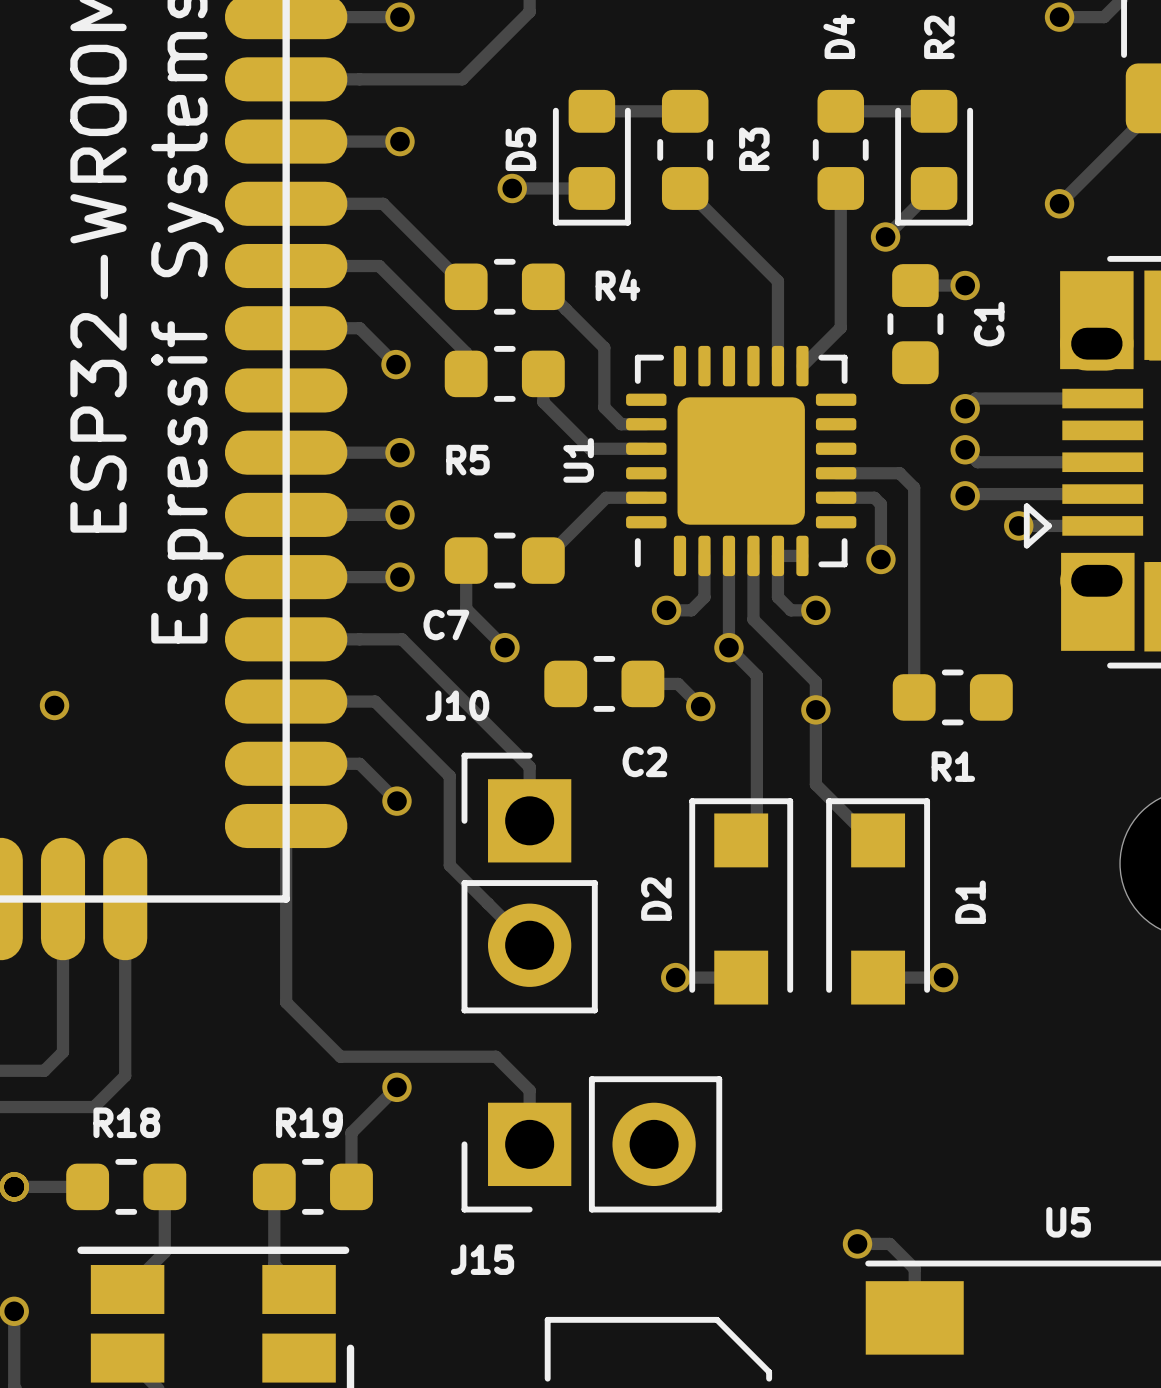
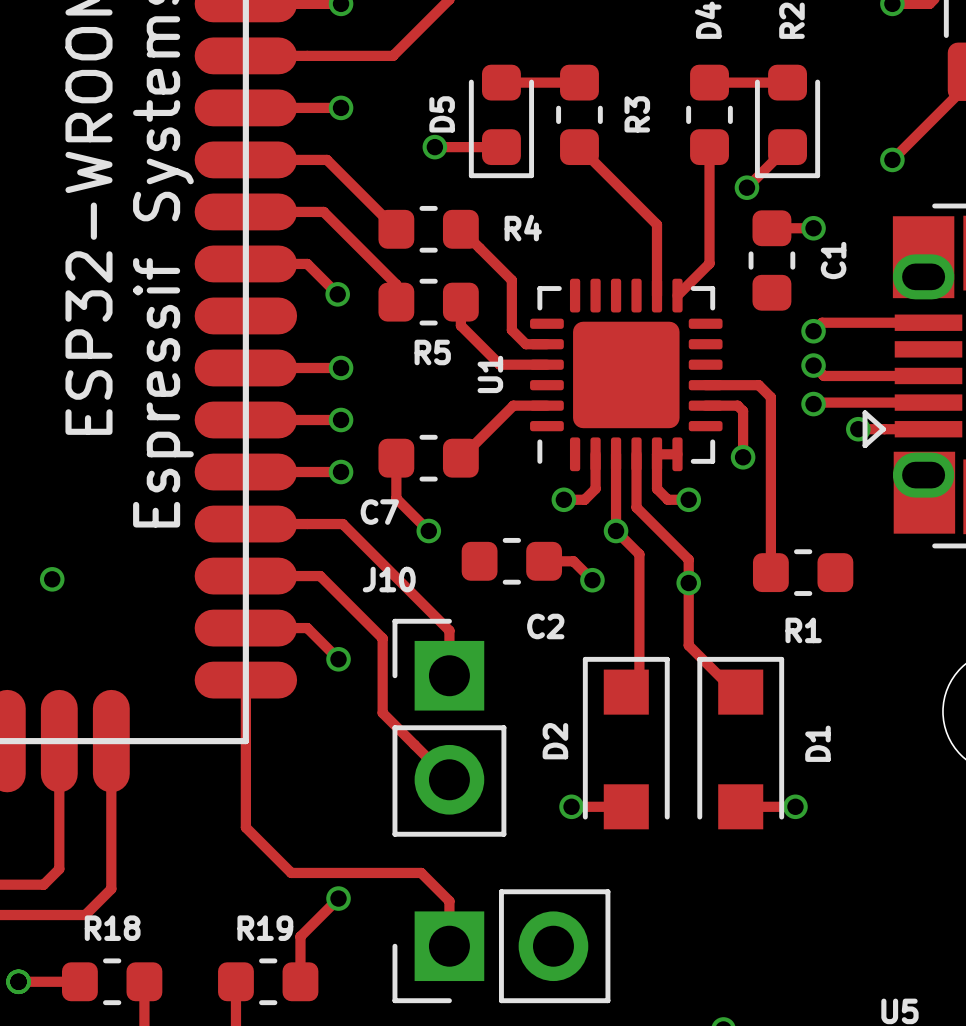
R5 name position: R5 (468, 460) -> R5 (432, 352)

